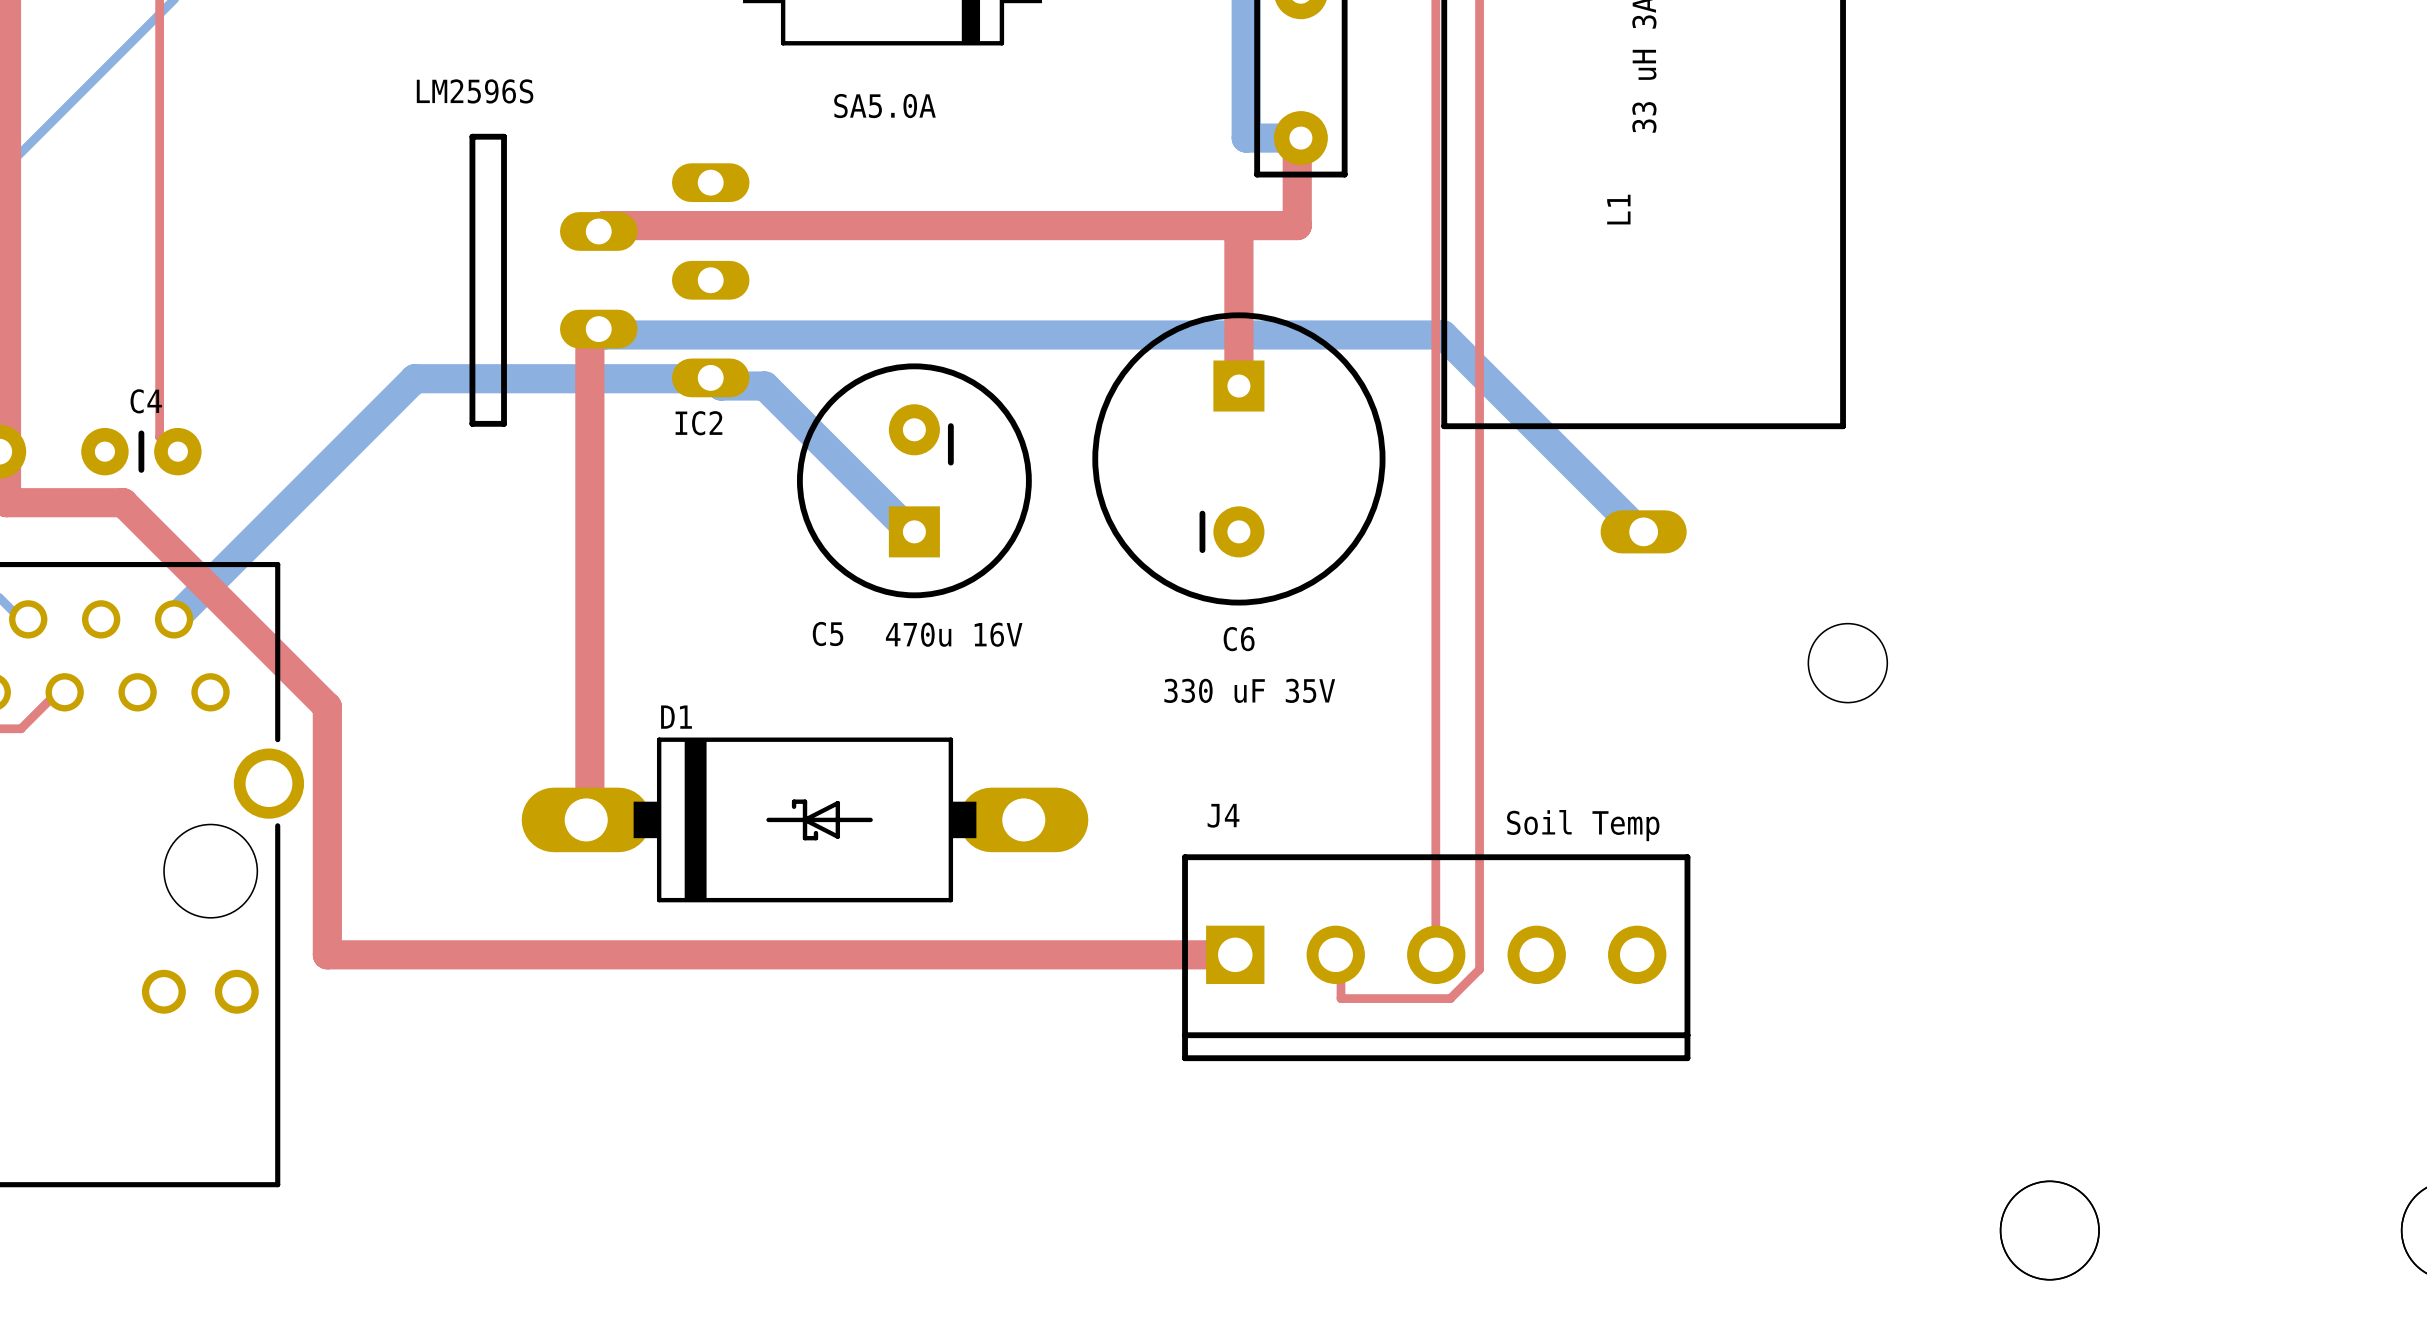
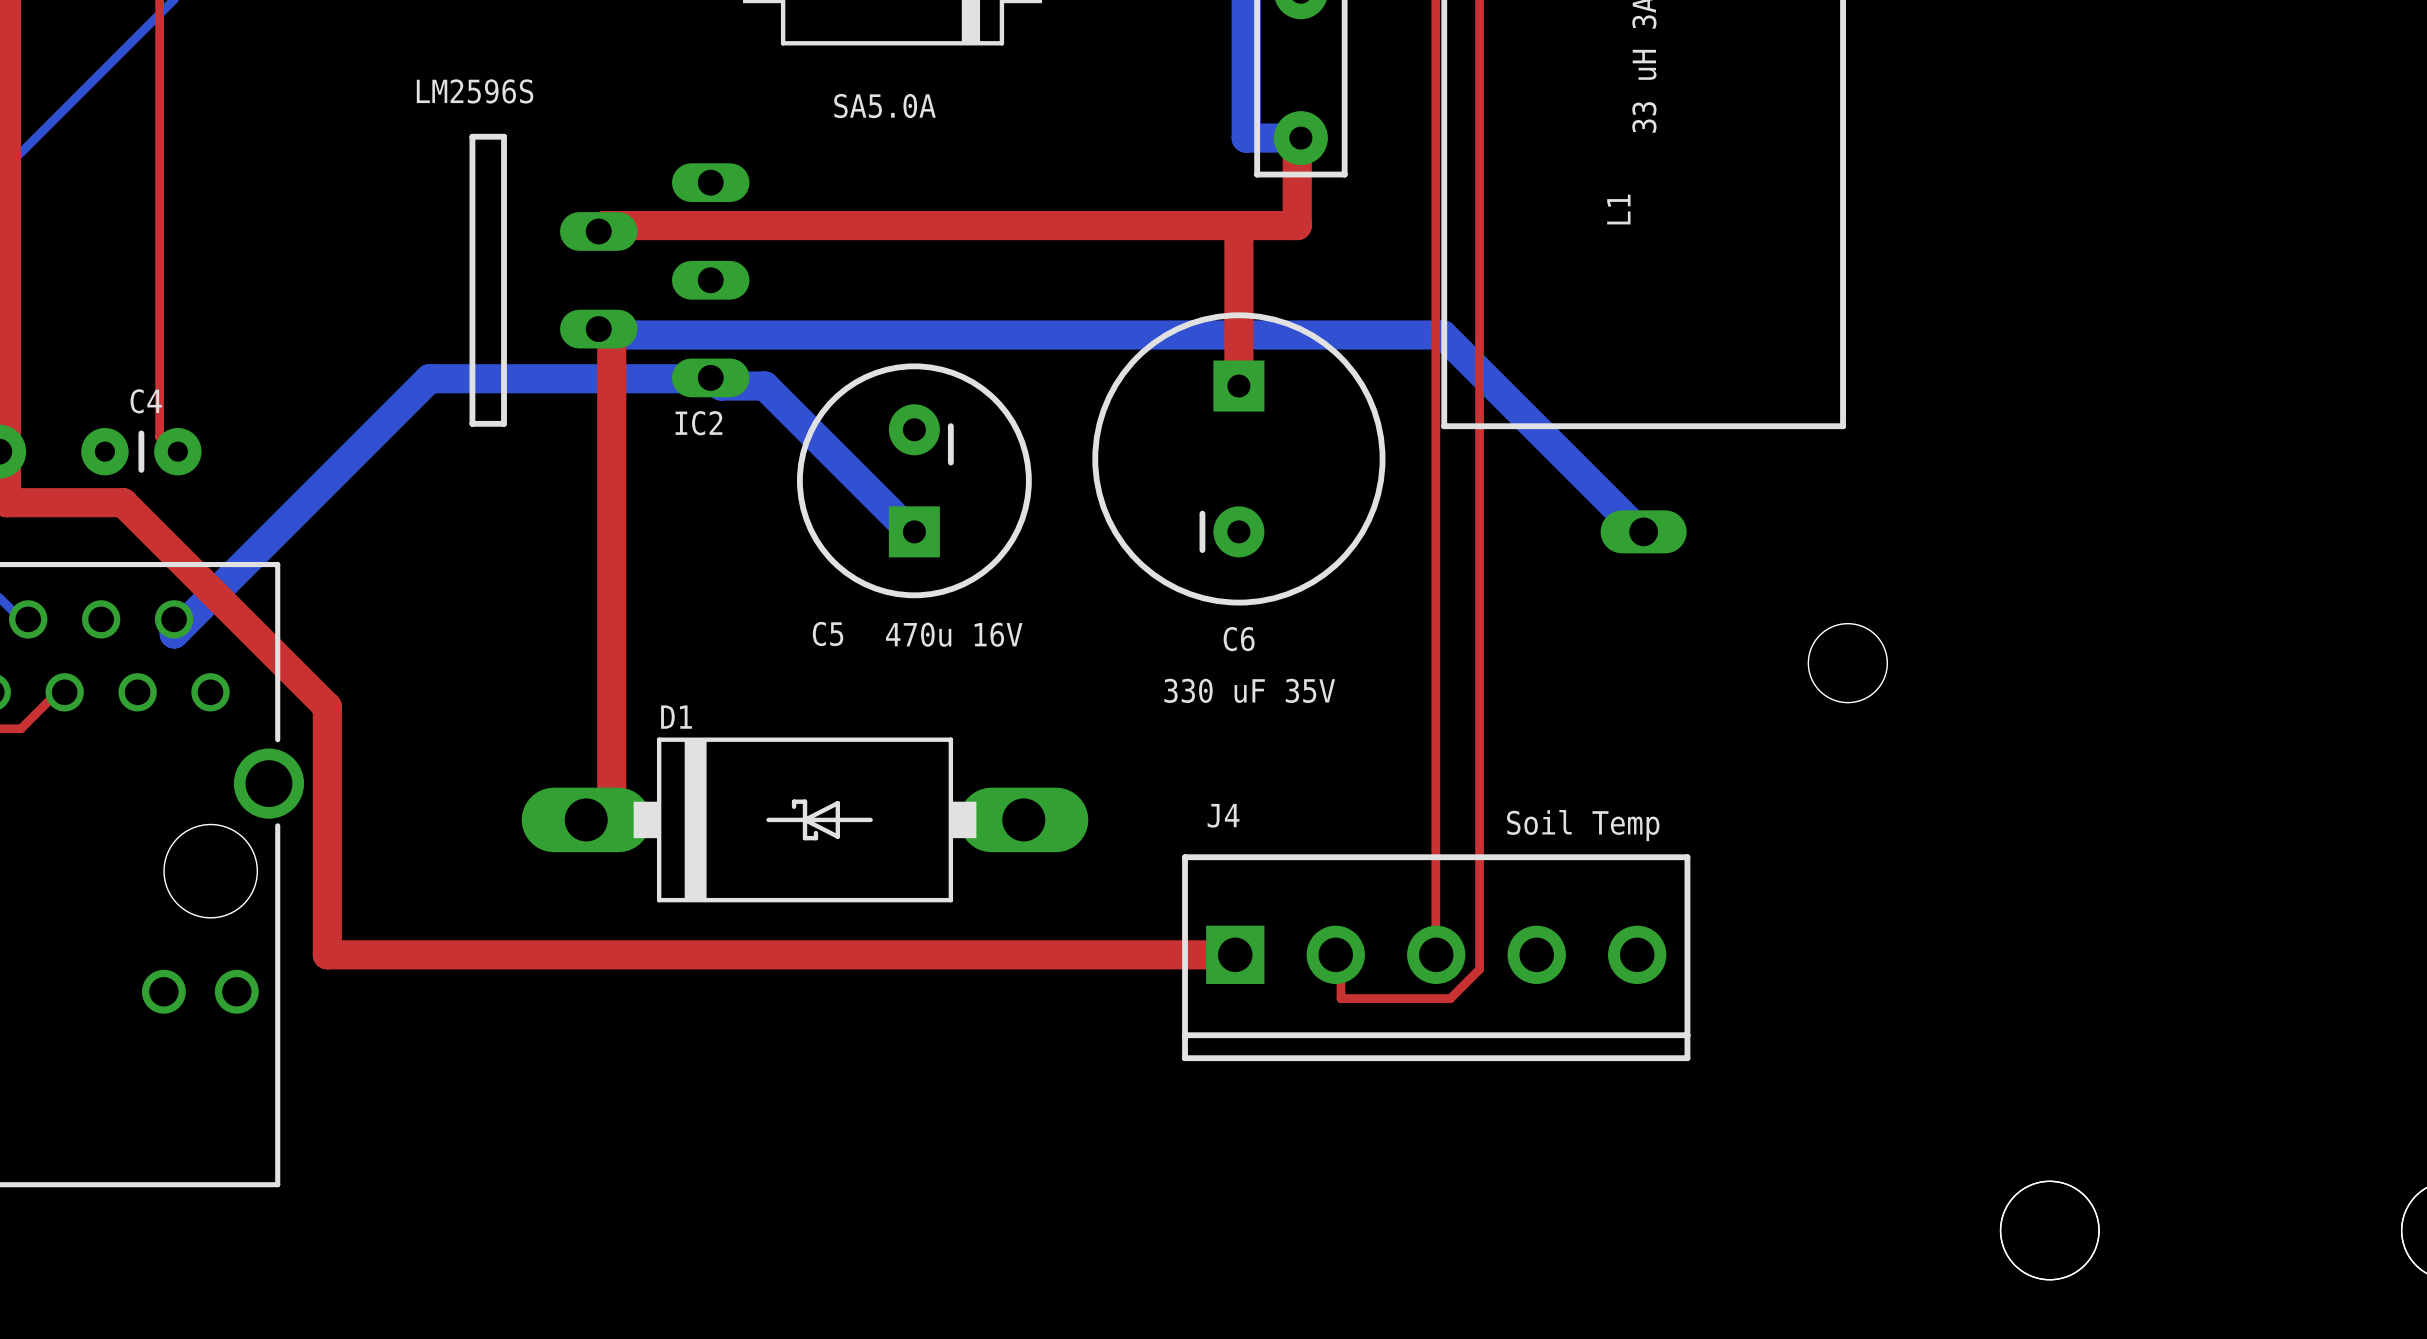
top track: (598, 329) (597, 334) (589, 342) (589, 816) (586, 819) -> (598, 329) (611, 342) (611, 816) (586, 819)
bottom track: (429, 378) (414, 378) (174, 619) -> (429, 378) (174, 633) (174, 619)

